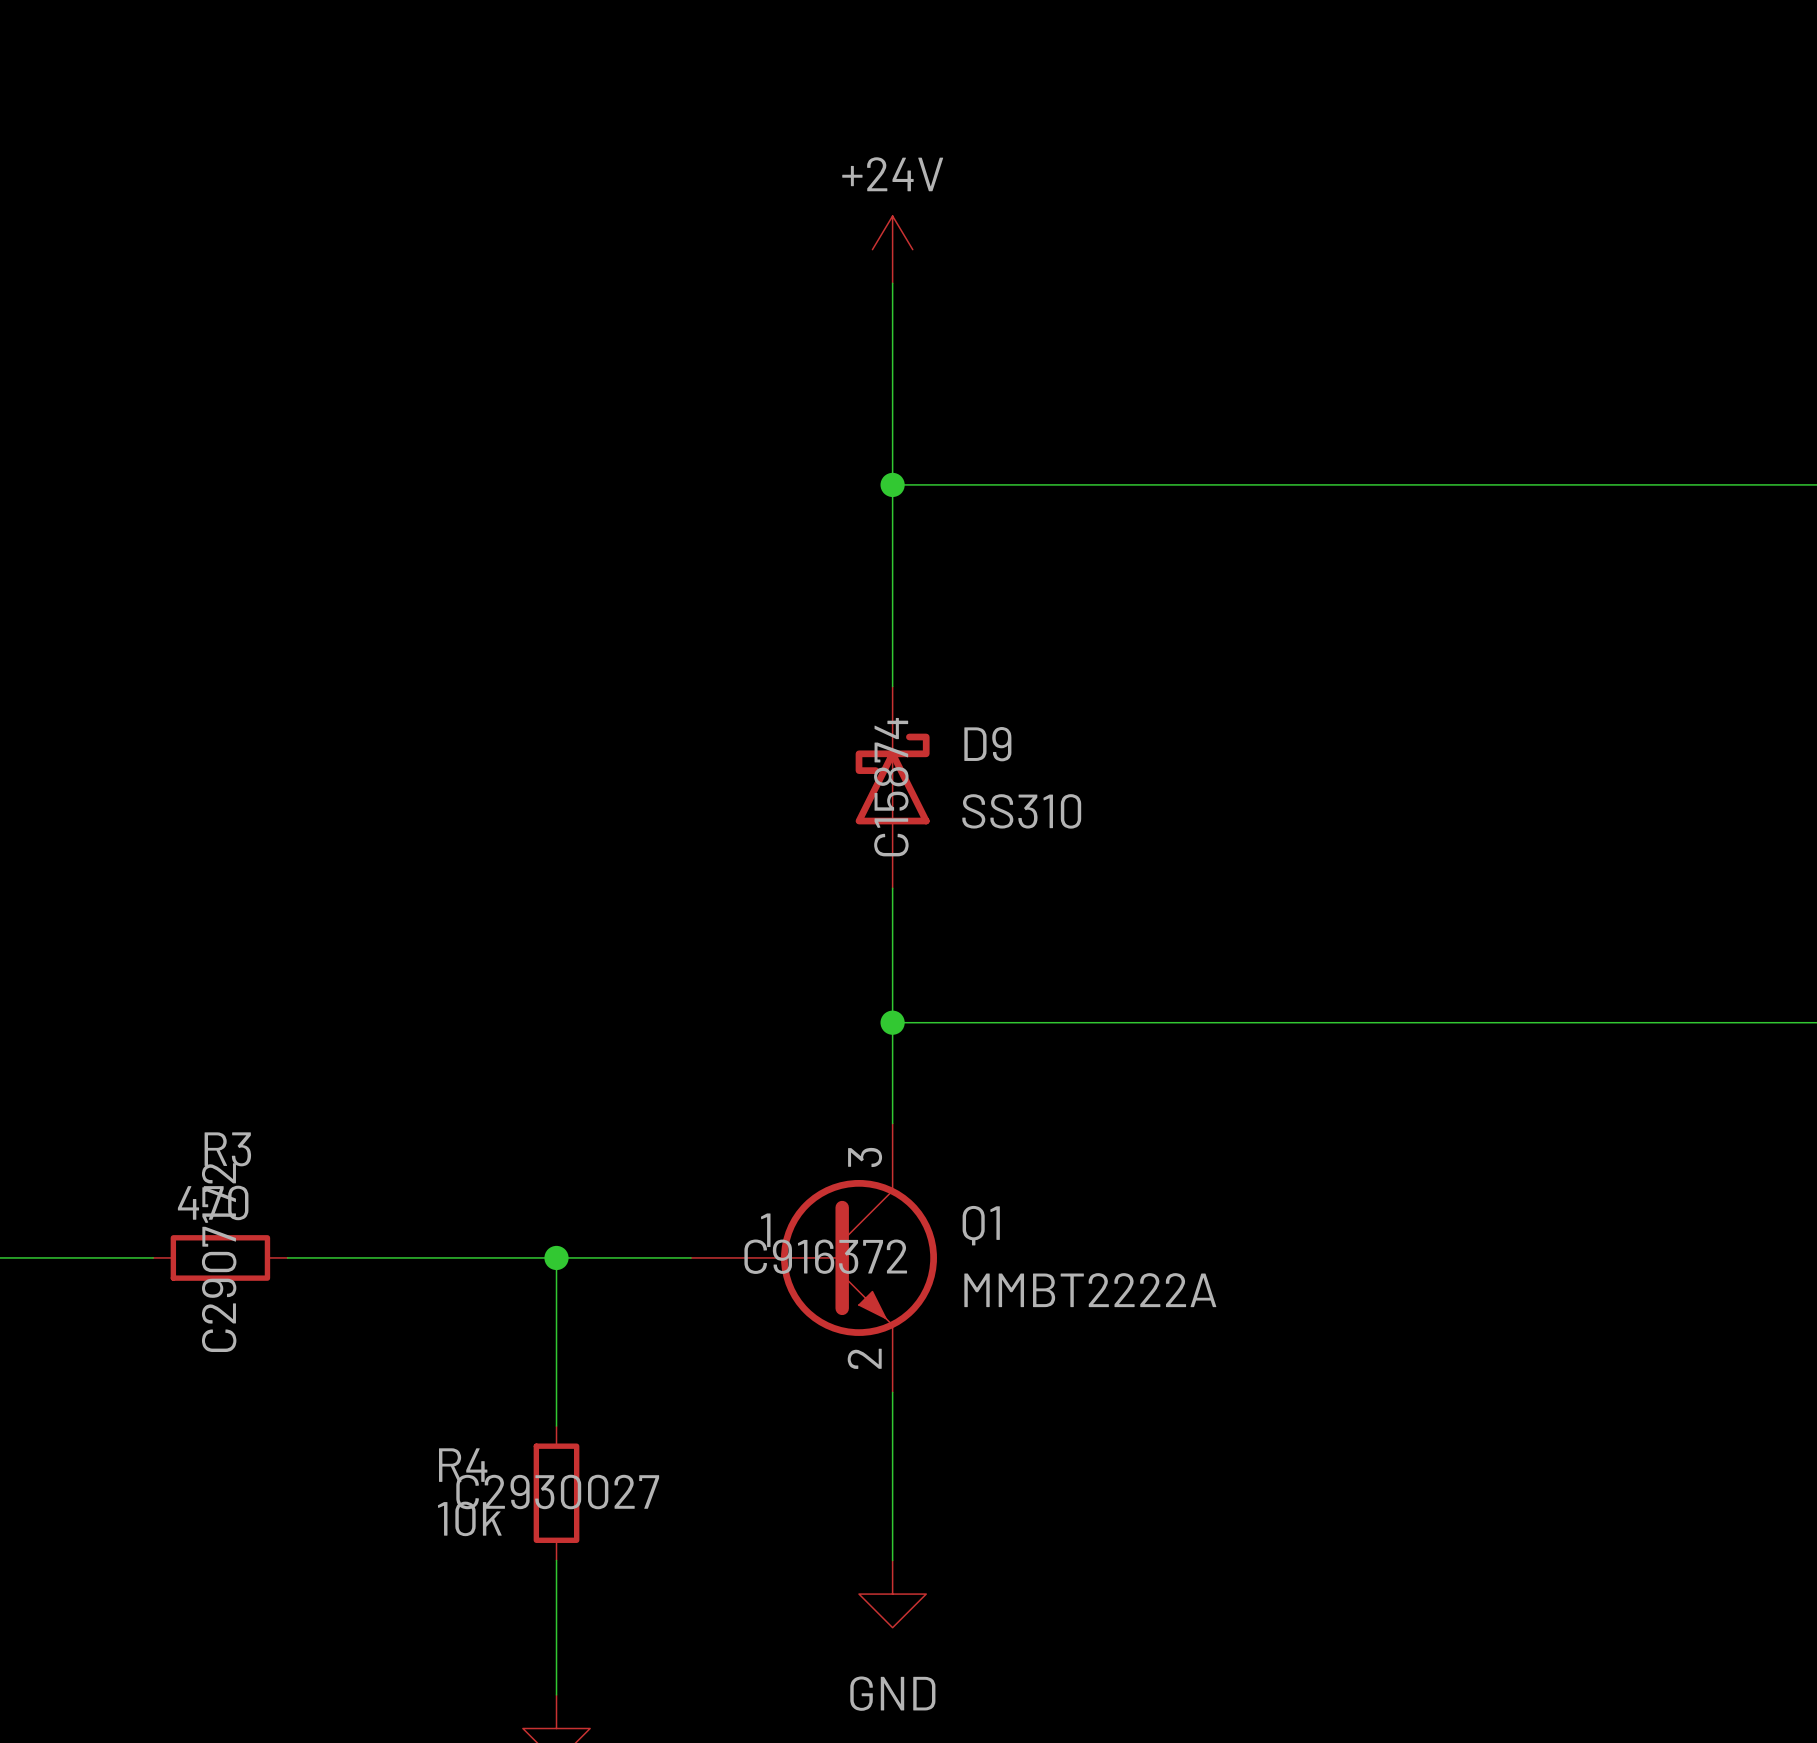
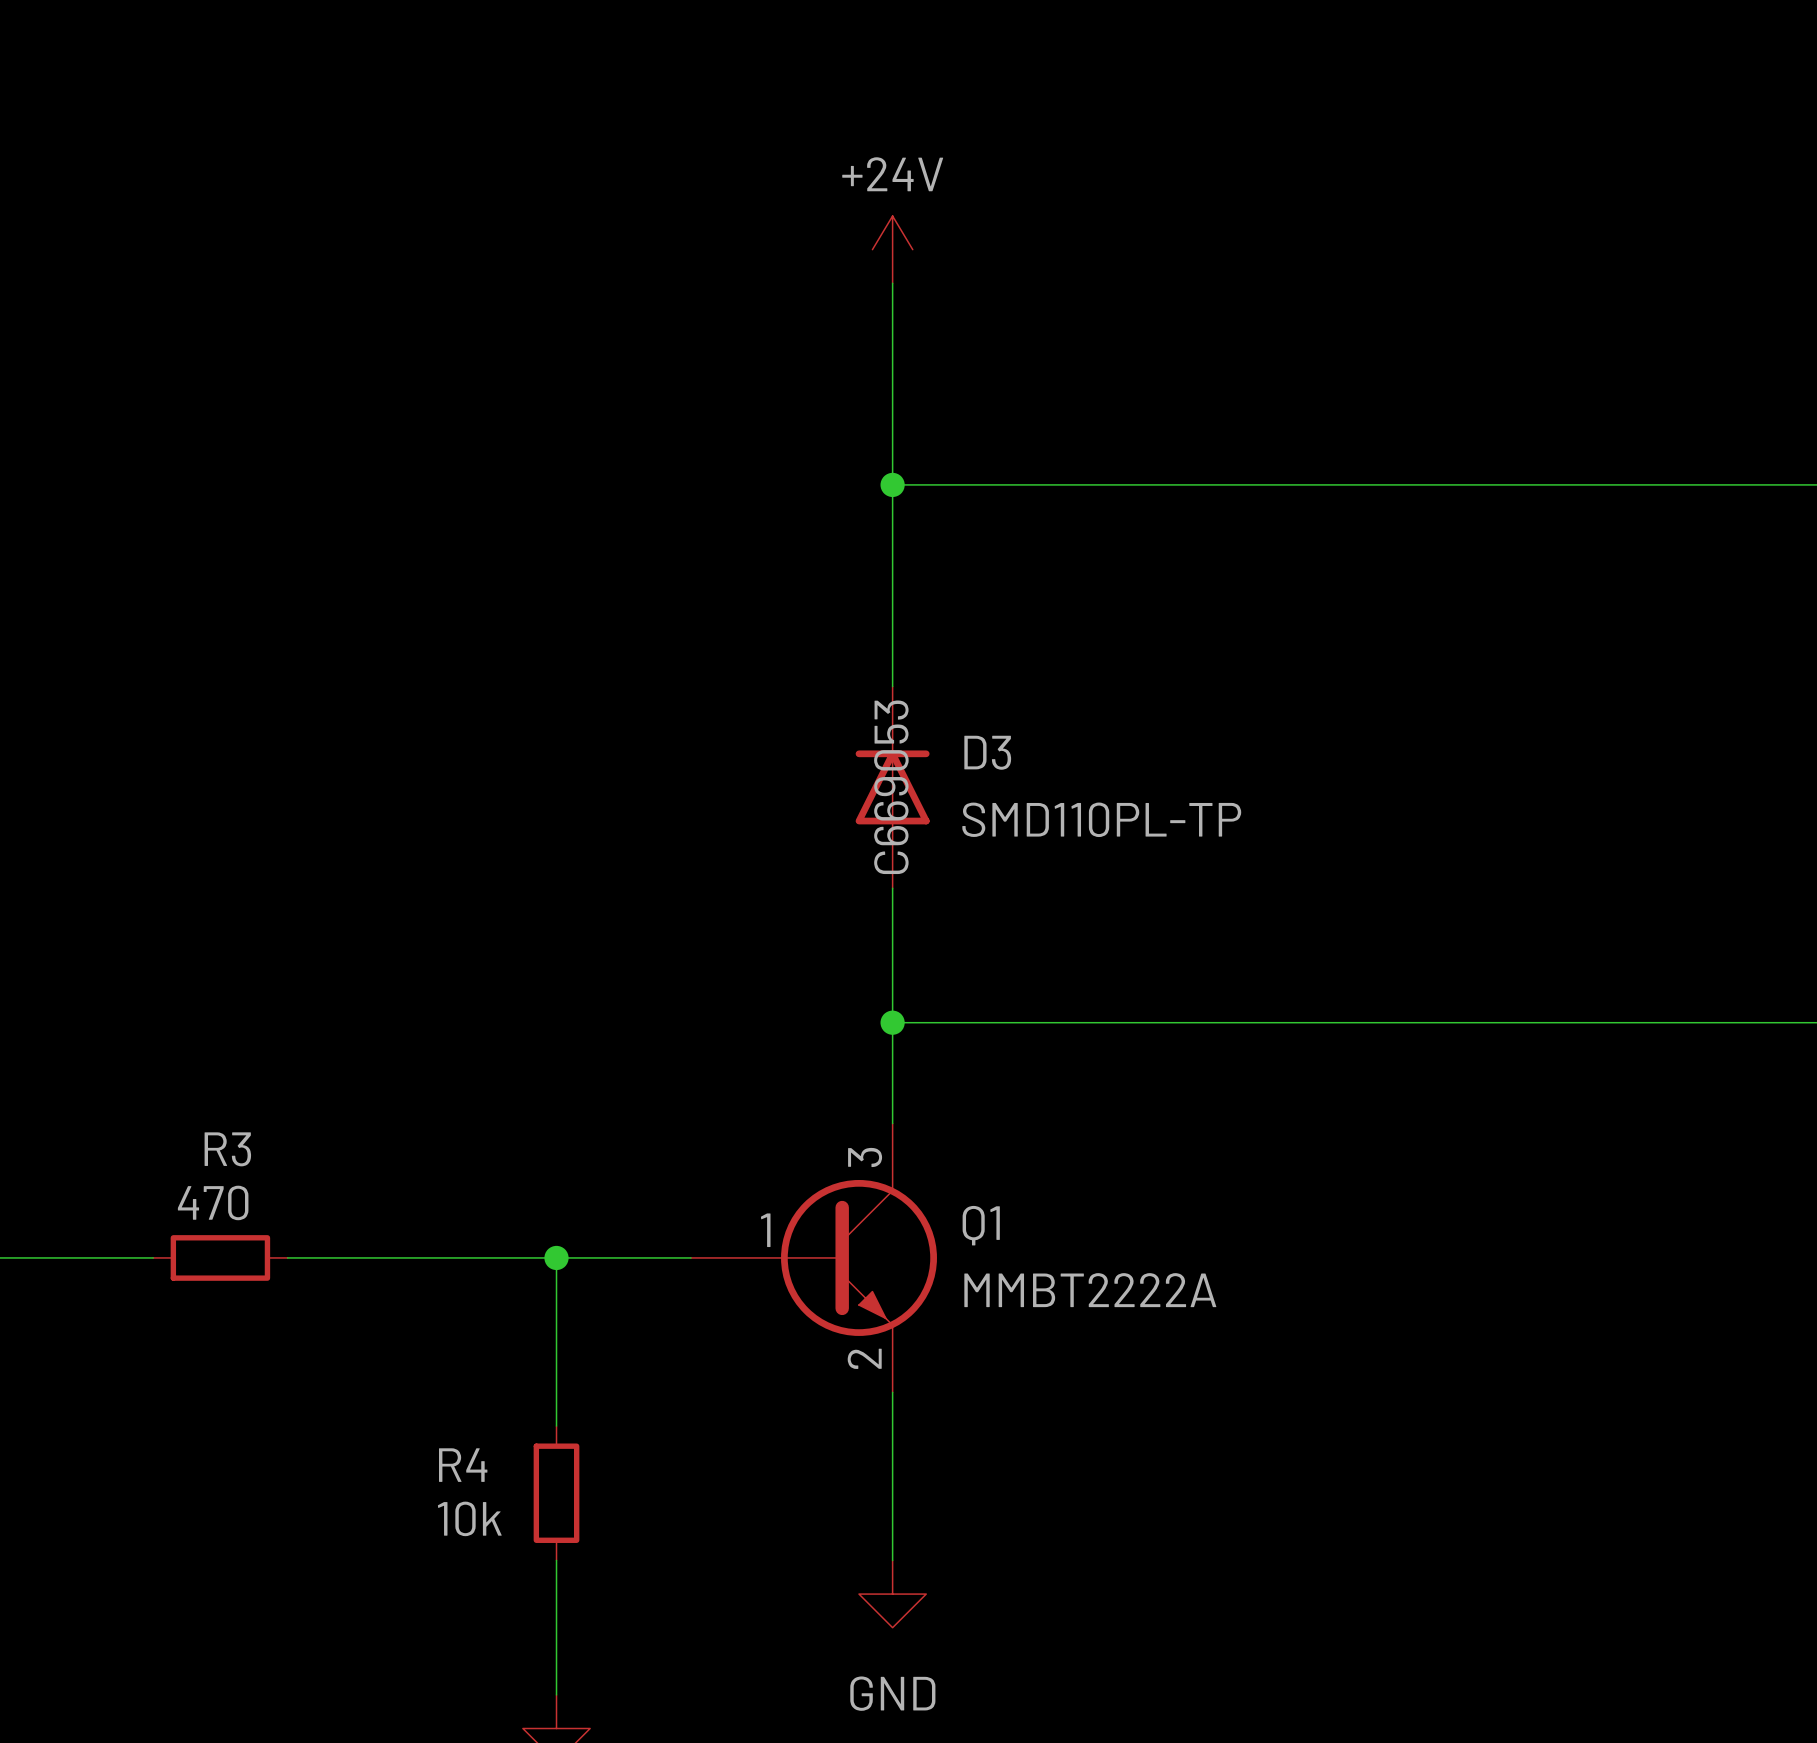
D9: SS310 (892, 787) -> none
D3: none -> SMD110PL-TP (892, 787)
Q1 text: C916372 (825, 1256) -> none
R3 text: C2907172 (219, 1257) -> none
R4 text: C2930027 (557, 1492) -> none

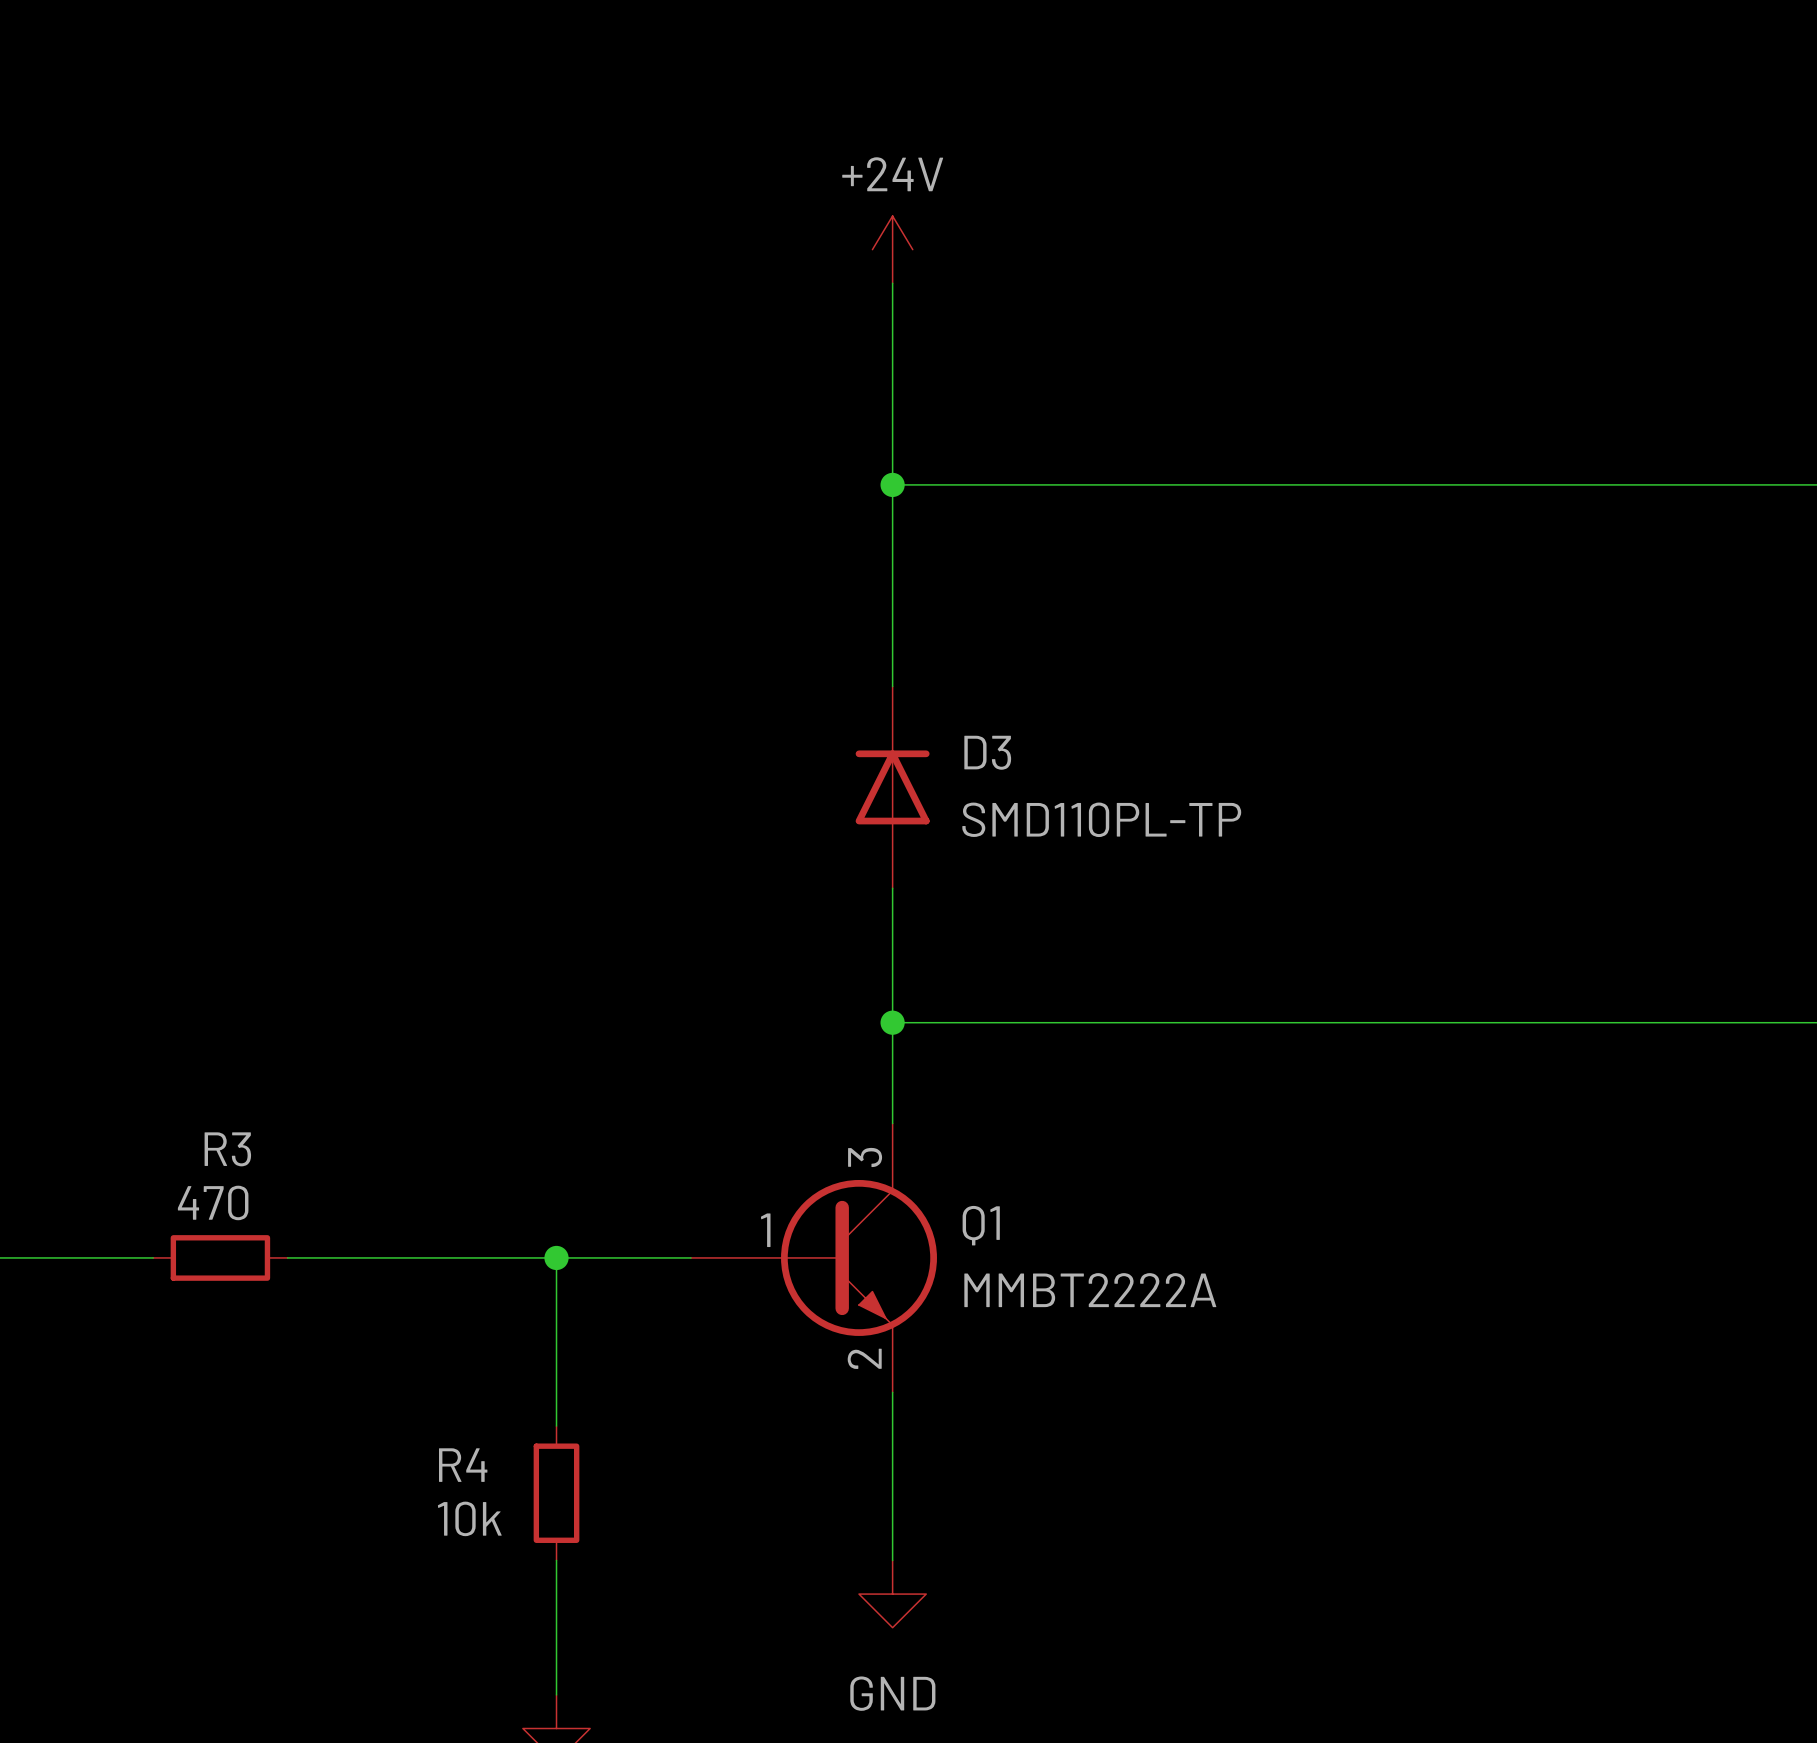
D3 text: C669053 (891, 787) -> none

